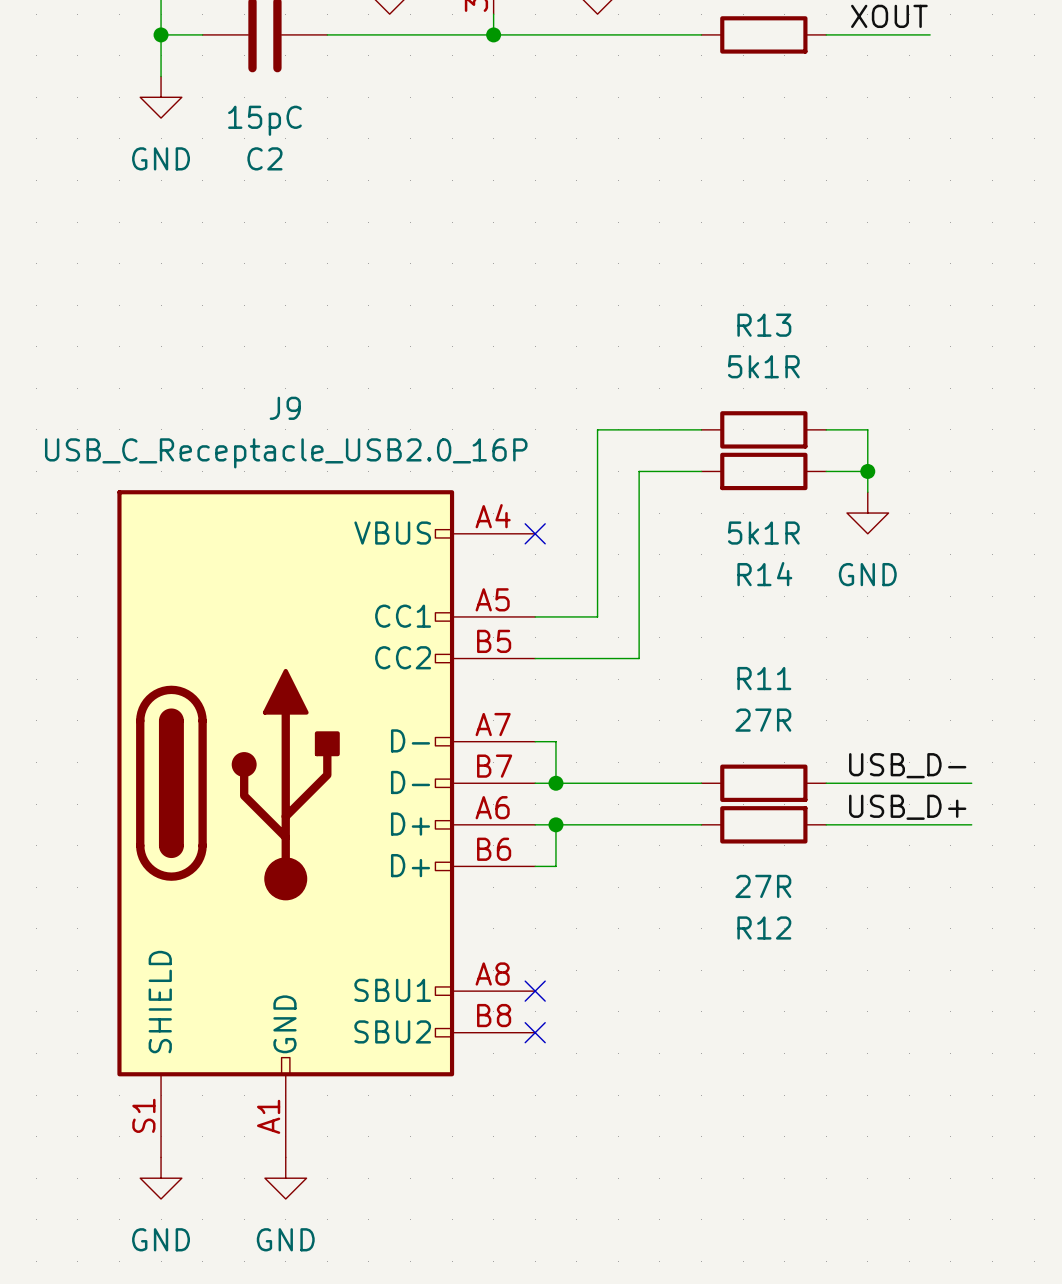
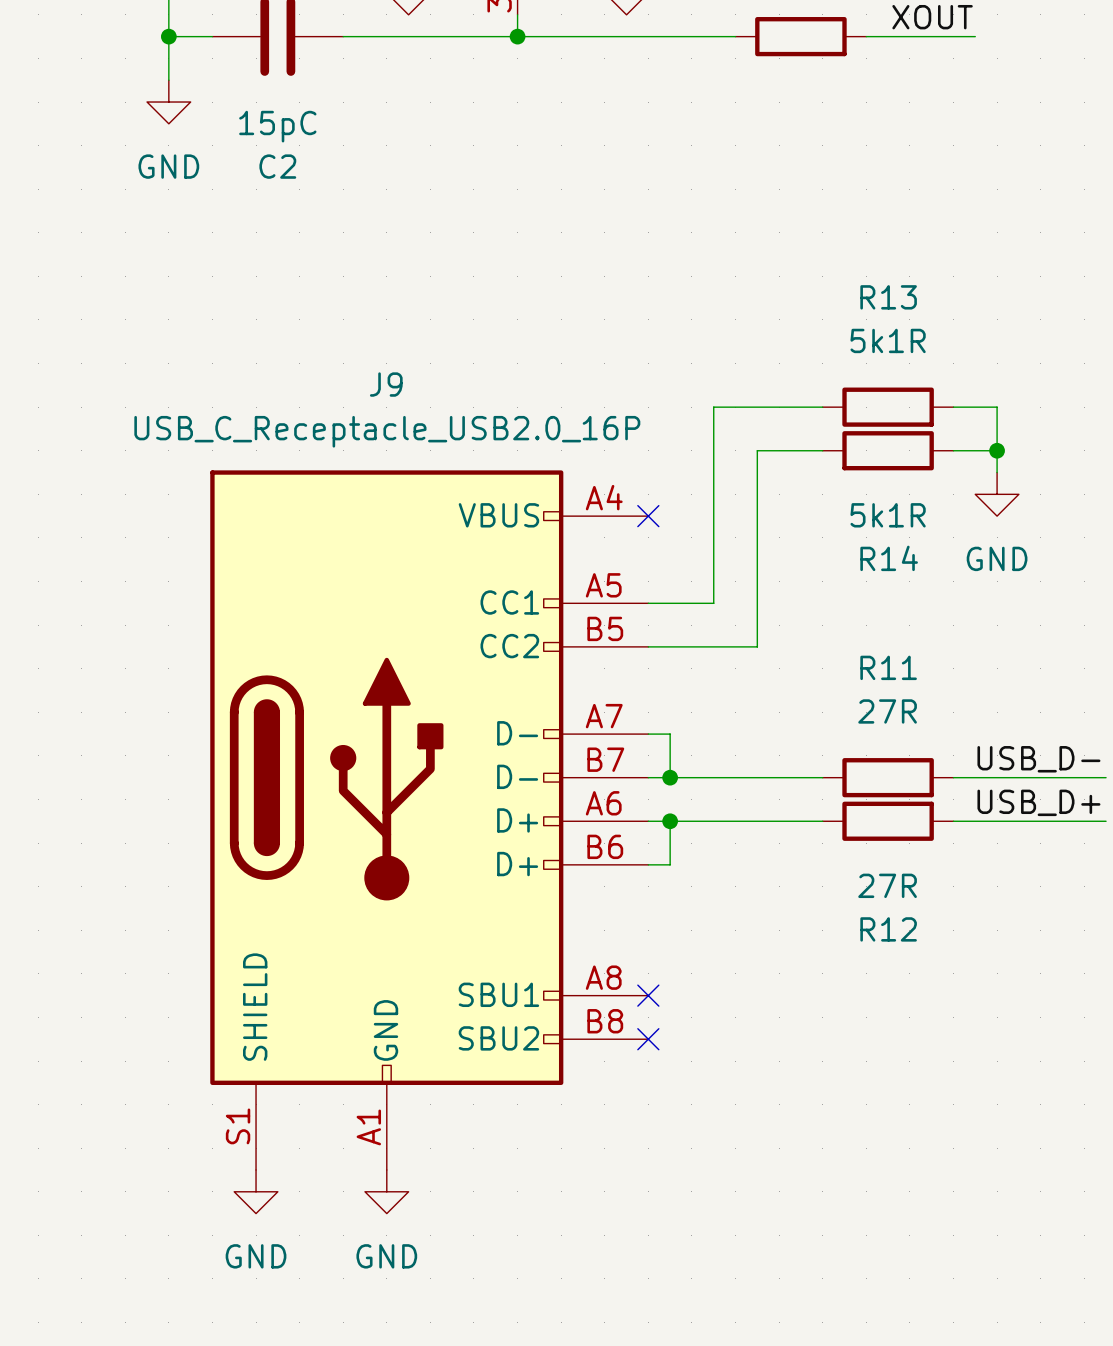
wire: (701, 429) (597, 429) (597, 616) (535, 616) -> (822, 407) (713, 407) (713, 603) (648, 603)
R13 position: (763, 429) -> (888, 407)
wire: (826, 429) (867, 429) (867, 492) -> (953, 407) (997, 407) (997, 472)
wire: (701, 471) (639, 471) (639, 658) (535, 658) -> (822, 450) (757, 450) (757, 646) (648, 646)
R14 position: (763, 471) -> (888, 450)
wire: (826, 471) (867, 471) -> (953, 450) (997, 450)
junction position: (867, 471) -> (997, 450)
power symbol position: GND (867, 513) -> GND (997, 494)
no-connect mark position: (535, 533) -> (648, 516)
wire: (535, 741) (555, 741) (555, 783) -> (648, 734) (670, 734) (670, 777)
wire: none -> (648, 777) (822, 777)
junction: none -> (670, 777)
label position: USB_D- (907, 765) -> USB_D- (1038, 759)
junction: (555, 783) -> none
junction: none -> (670, 821)
R11 position: (763, 783) -> (888, 777)
wire: (826, 783) (909, 783) -> (735, 821) (822, 821)
wire: none -> (1018, 821) (1106, 821)
label position: USB_D+ (907, 807) -> USB_D+ (1038, 802)
J9 position: (326, 823) -> (429, 820)
wire: (555, 824) (555, 866) (535, 866) -> none
junction: (555, 824) -> none
wire: (639, 824) (701, 824) -> (670, 864) (670, 821)
R12 position: (763, 824) -> (888, 821)
wire: (826, 824) (971, 824) -> (953, 777) (1106, 777)
no-connect mark: none -> (648, 995)
no-connect mark: (535, 991) -> none
no-connect mark: none -> (648, 1039)
no-connect mark: (535, 1032) -> none
power symbol: none -> GND (256, 1191)
power symbol: none -> GND (386, 1191)
power symbol: GND (161, 1178) -> none
power symbol: GND (285, 1178) -> none

